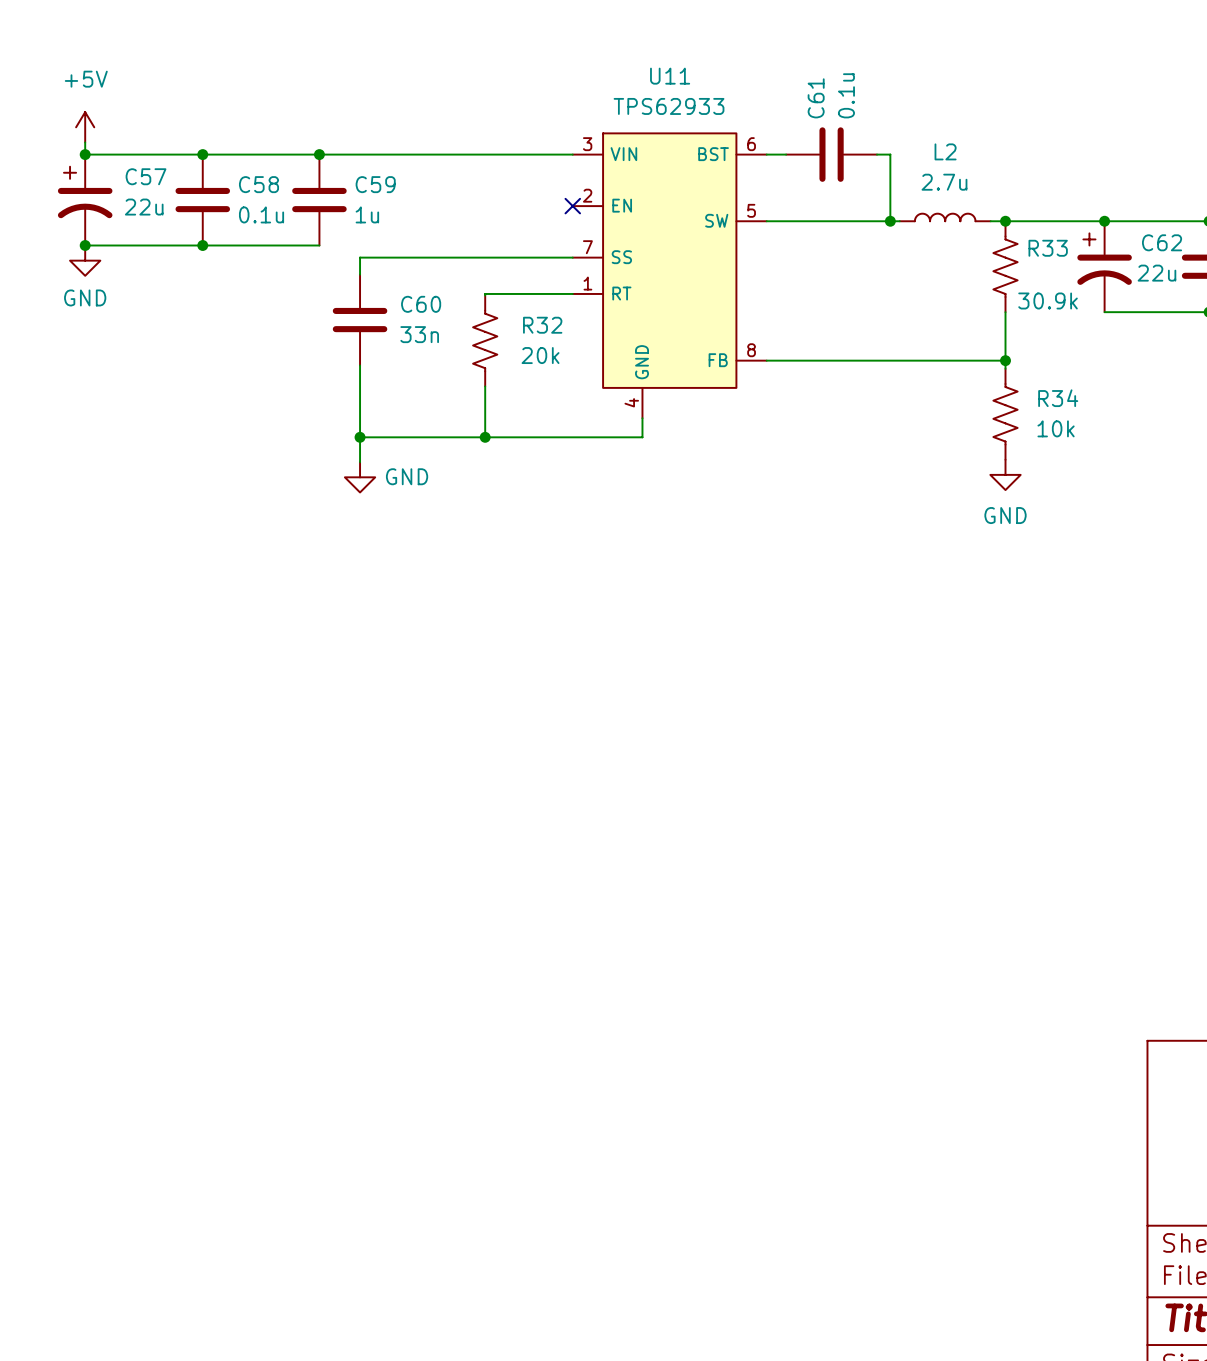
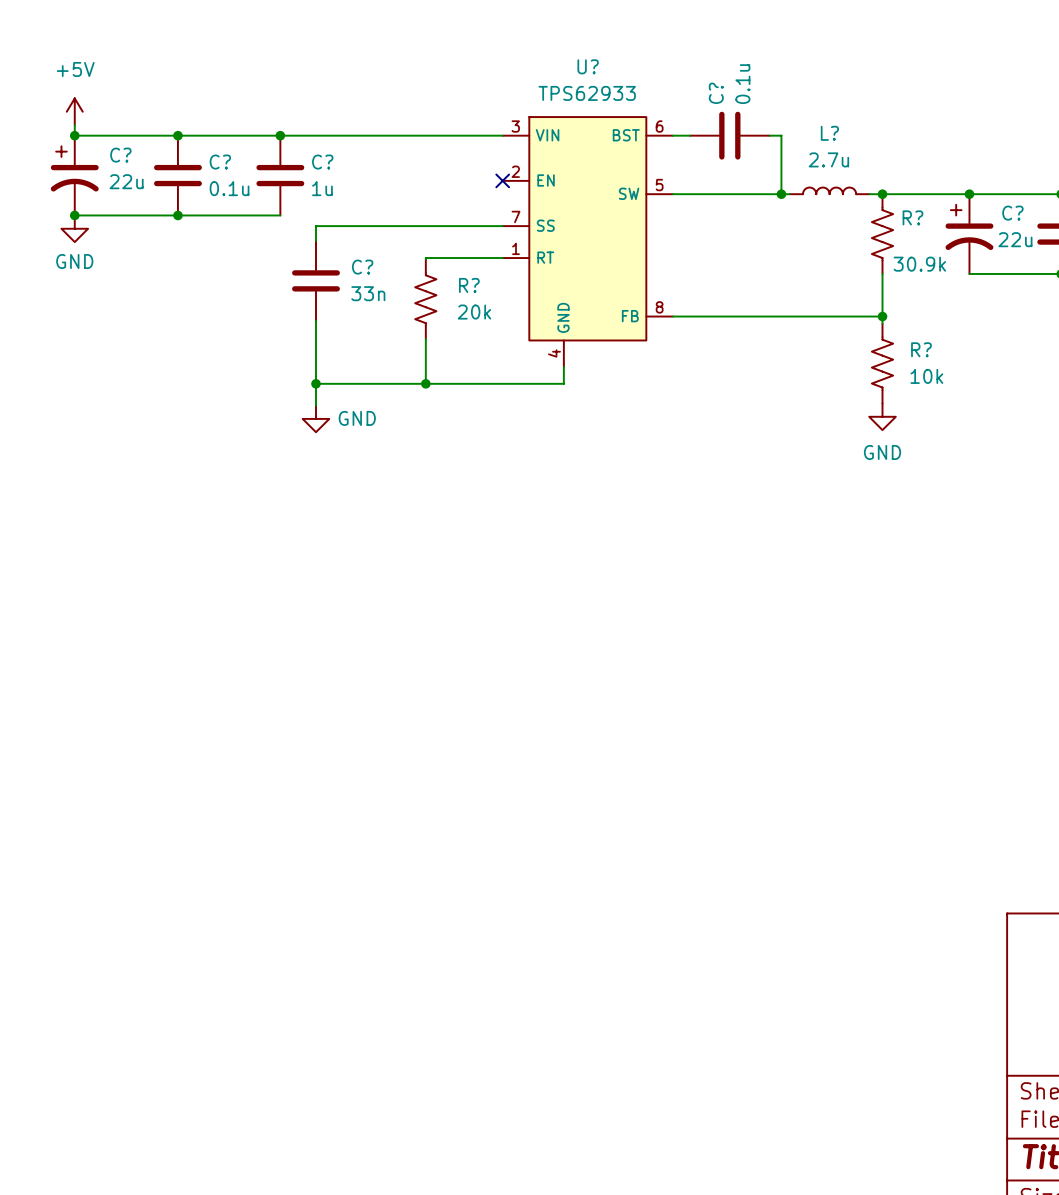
U11 name: U11 (670, 76) -> U? (588, 66)
C61 name: C61 (816, 98) -> C? (716, 93)
L2 name: L2 (945, 151) -> L? (829, 133)
C57 name: C57 (146, 176) -> C? (120, 155)
C58 name: C58 (259, 184) -> C? (220, 162)
C59 name: C59 (375, 184) -> C? (322, 162)
C62 name: C62 (1162, 242) -> C? (1012, 213)
R33 name: R33 (1048, 248) -> R? (912, 217)
C60 name: C60 (421, 304) -> C? (362, 267)
R32 name: R32 (542, 325) -> R? (469, 285)
R34 name: R34 (1058, 398) -> R? (921, 349)

